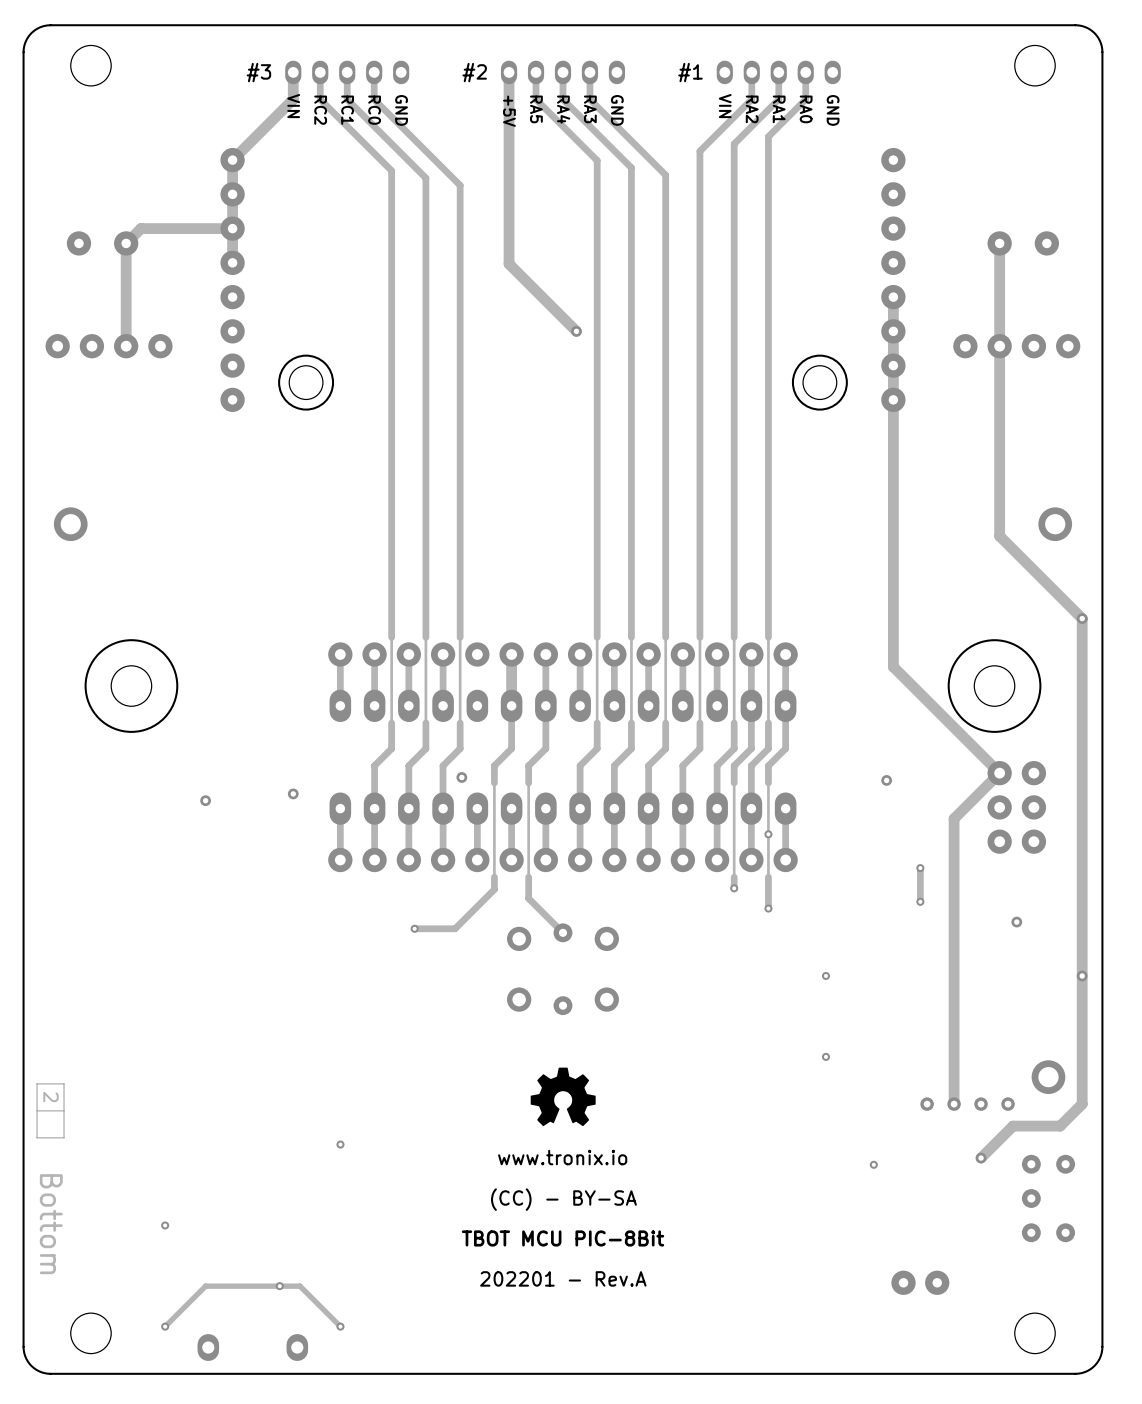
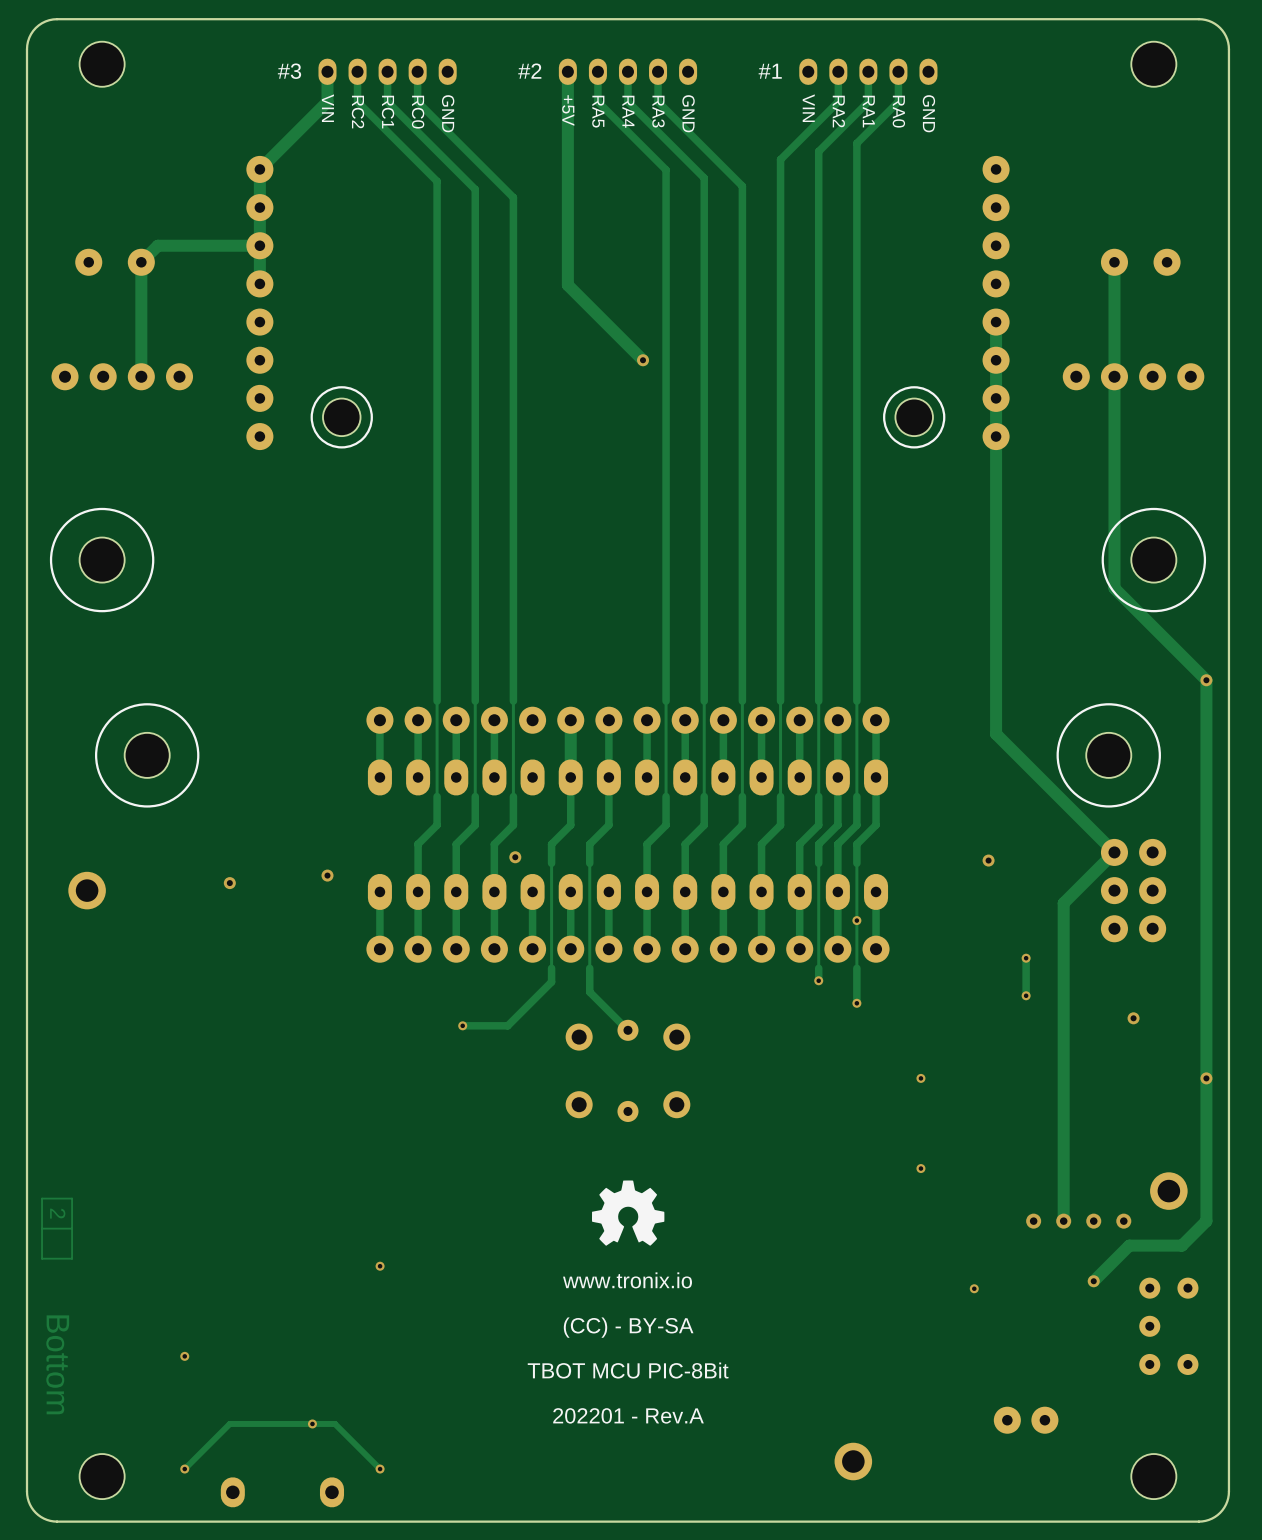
part: none -> (102, 560)
part: none -> (1153, 560)
part position: (70, 524) -> (87, 890)
part: (1055, 524) -> none
part: none -> (853, 1461)

